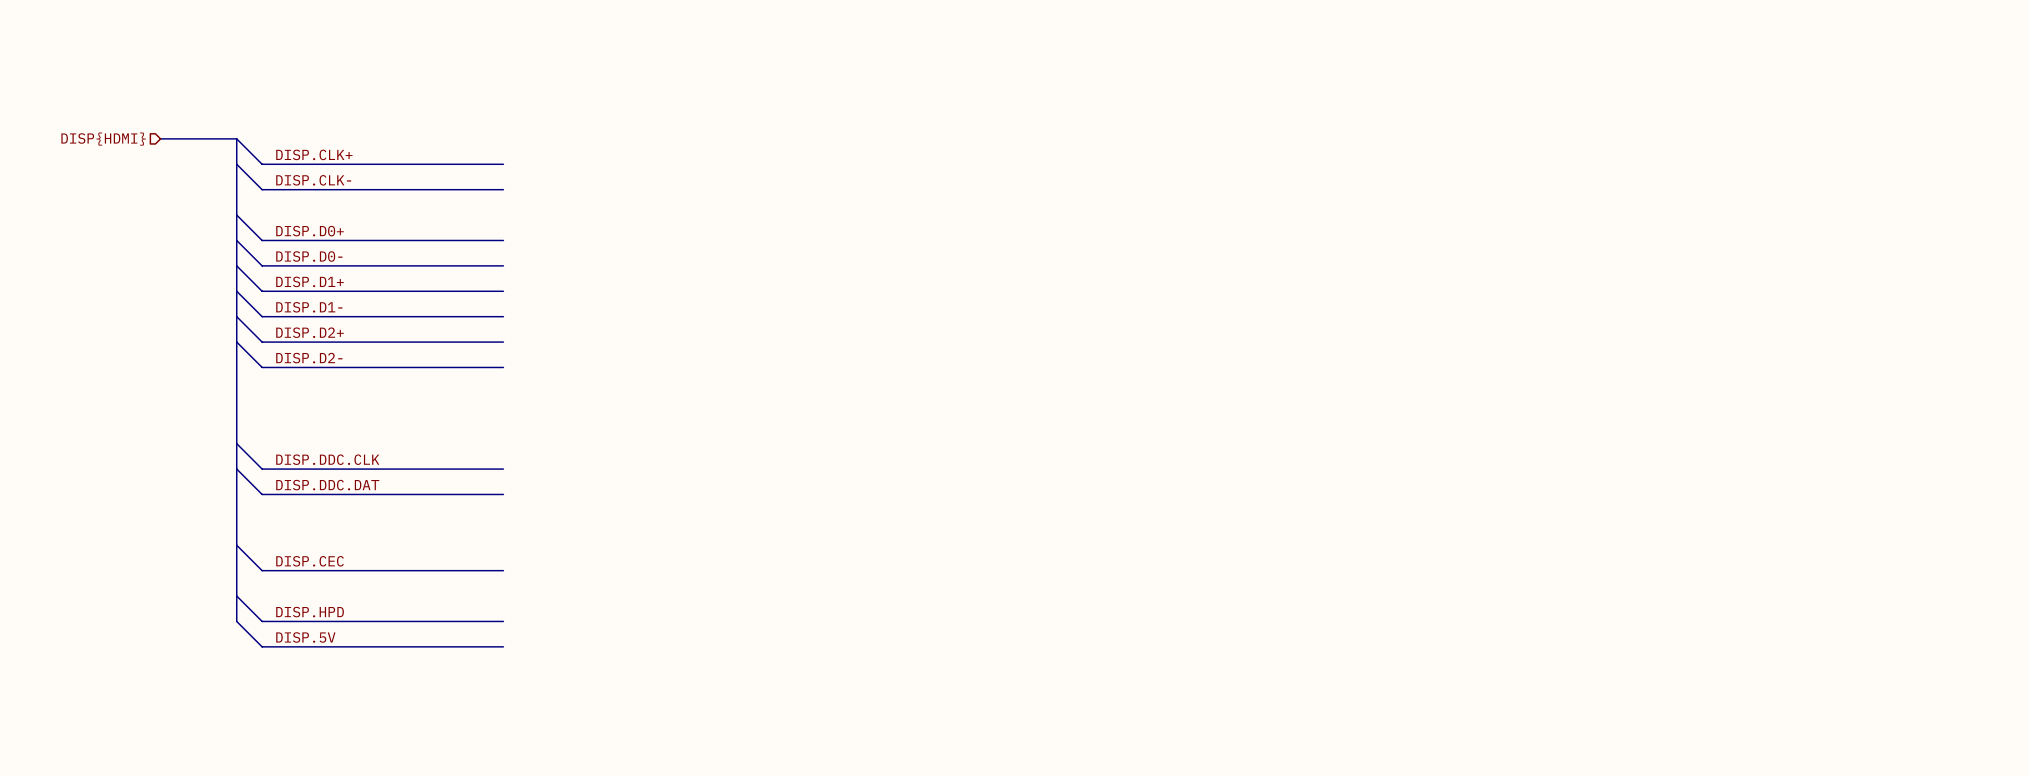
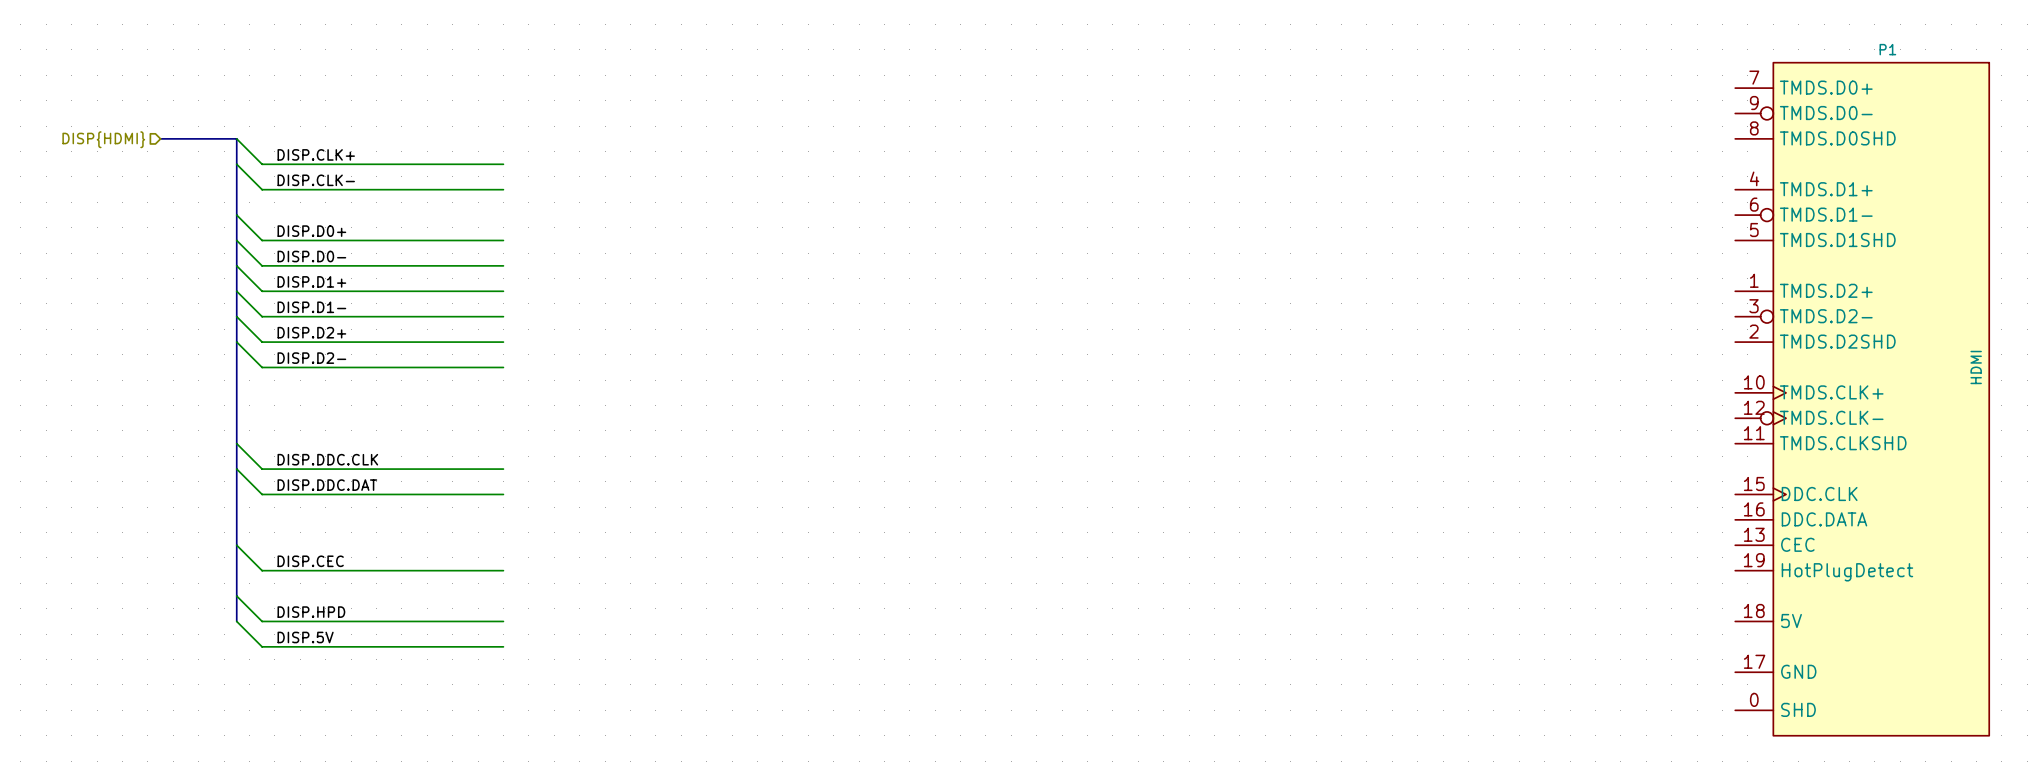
P1: none -> HDMI (1862, 399)

